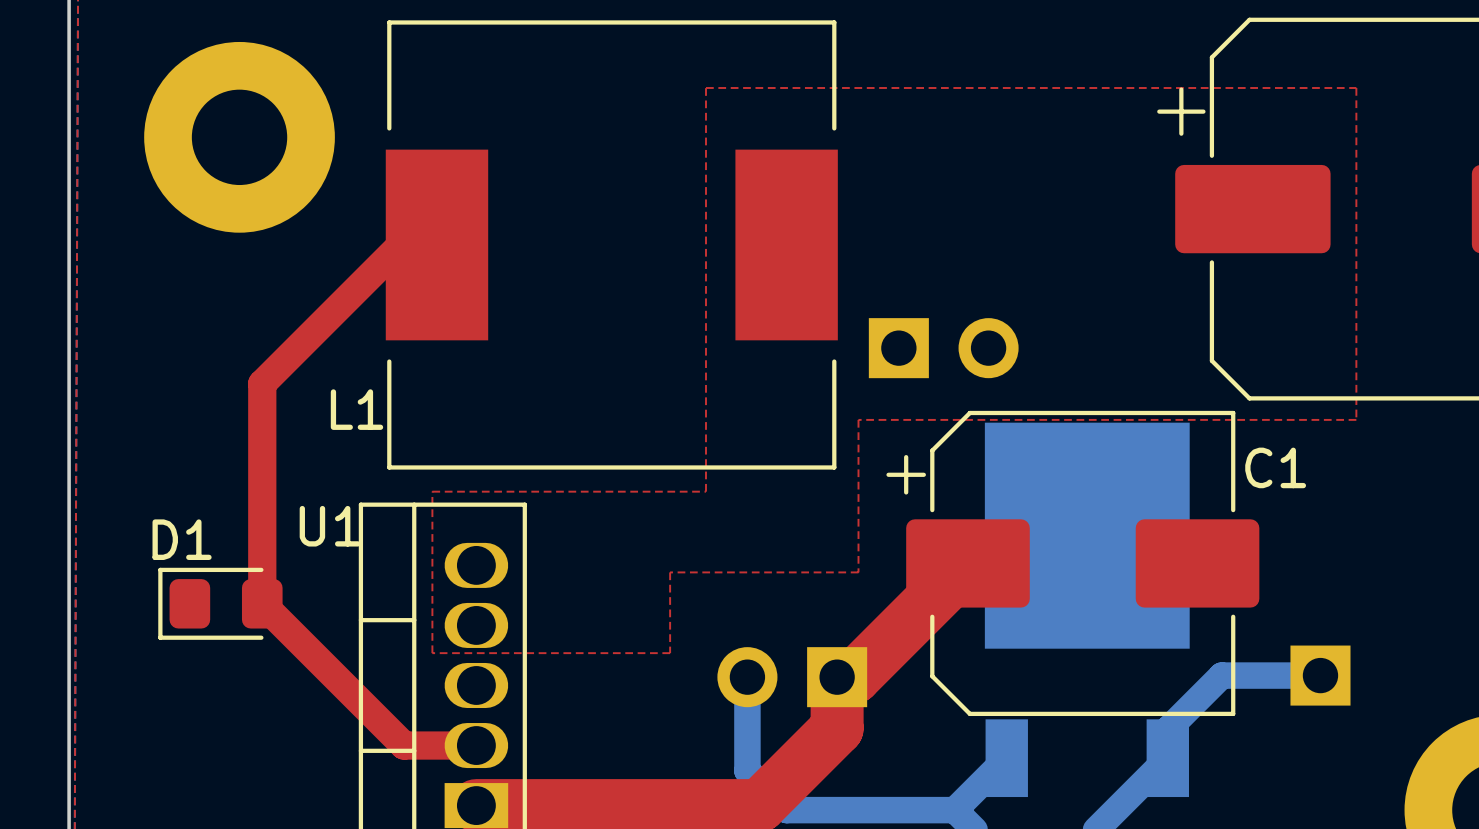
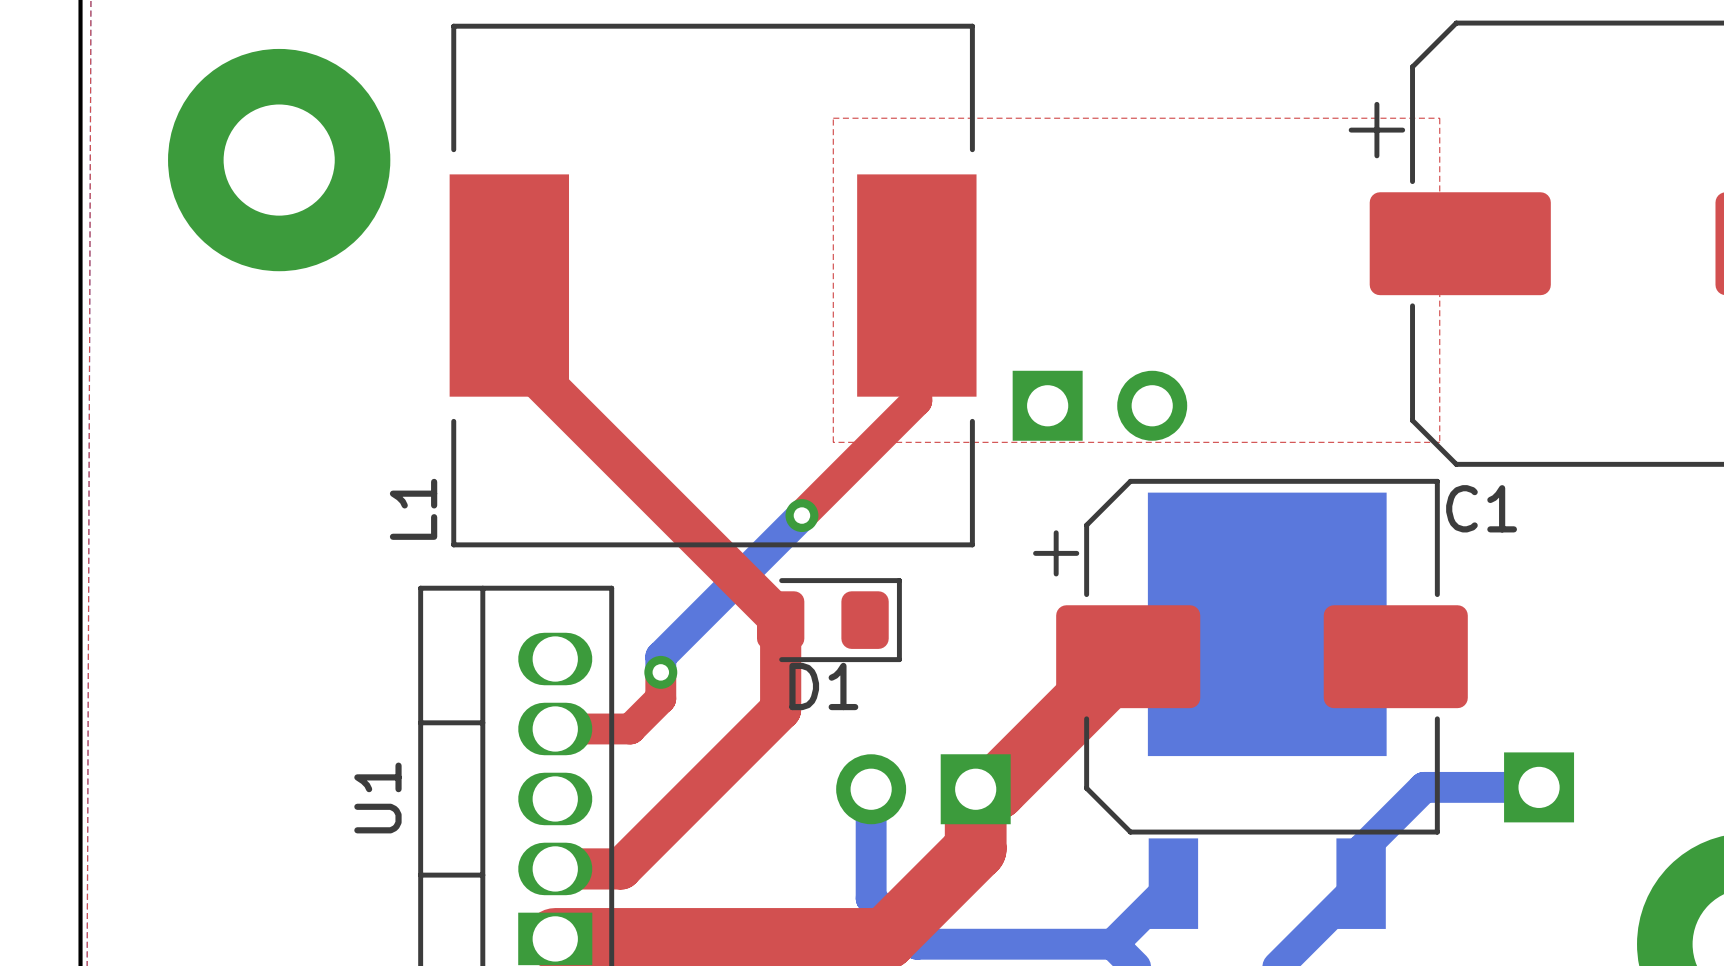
top zone outline: (706, 87) (706, 491) (432, 491) (432, 653) (670, 653) (670, 572) (858, 572) (858, 419) (1356, 419) (1356, 87) (706, 87) -> none
top zone outline: none -> (833, 118) (833, 442) (1439, 442) (1439, 118) (833, 118)
top track: (436, 244) (401, 244) (262, 383) (262, 603) (404, 745) (476, 745) -> (509, 285) (509, 348) (780, 620) (780, 709) (621, 868) (555, 868)
top track: none -> (916, 285) (916, 400) (801, 515)
L1 name rotation: 0° (356, 409) -> 90° counterclockwise (413, 509)
bottom track: none -> (801, 515) (660, 656) (660, 672)
via: none -> (801, 515)
C1 name position: C1 (1275, 467) -> C1 (1481, 508)
U1 name rotation: 0° (330, 526) -> 90° counterclockwise (377, 797)
U1 name position: U1 (330, 526) -> U1 (377, 797)
top track: none -> (660, 672) (660, 698) (630, 728) (555, 728)
via: none -> (660, 672)
D1 rotation: 0° (220, 603) -> 180° (829, 620)
D1 position: (220, 603) -> (829, 620)

